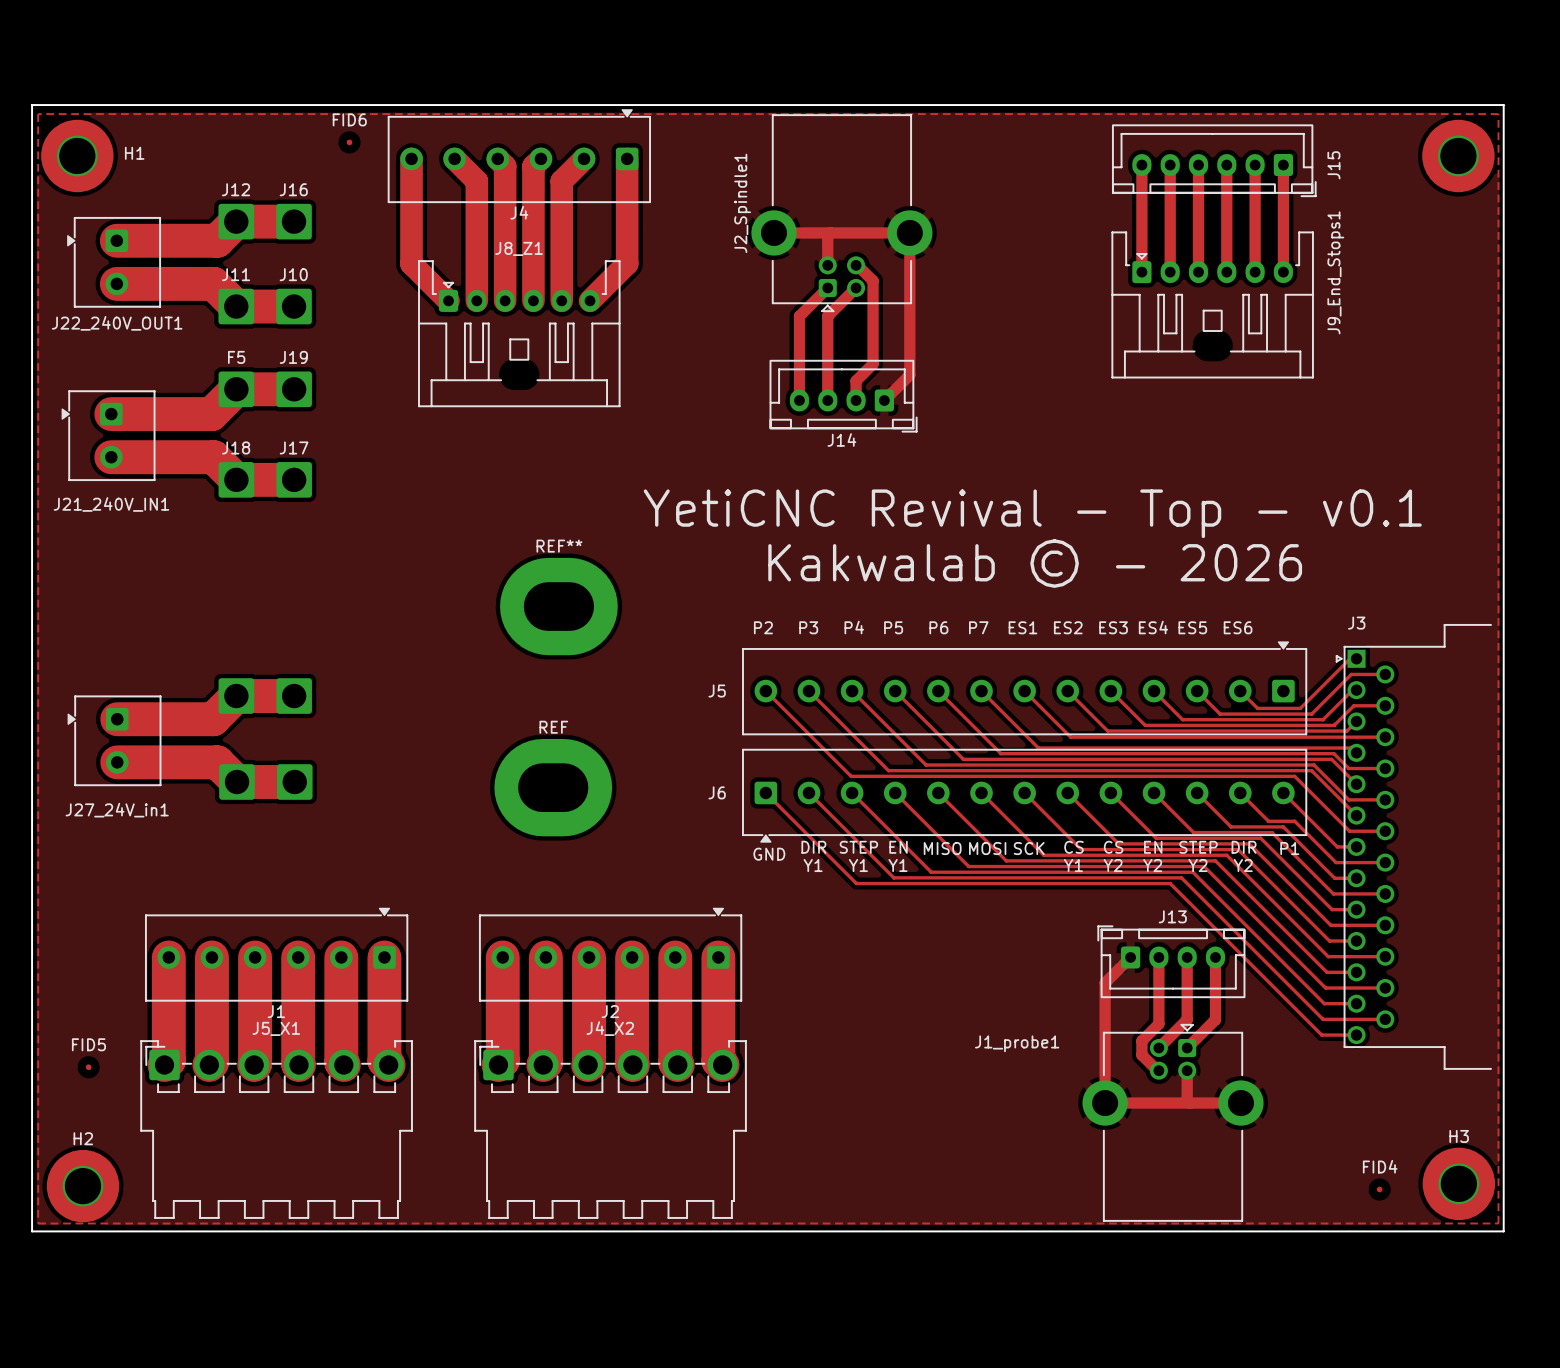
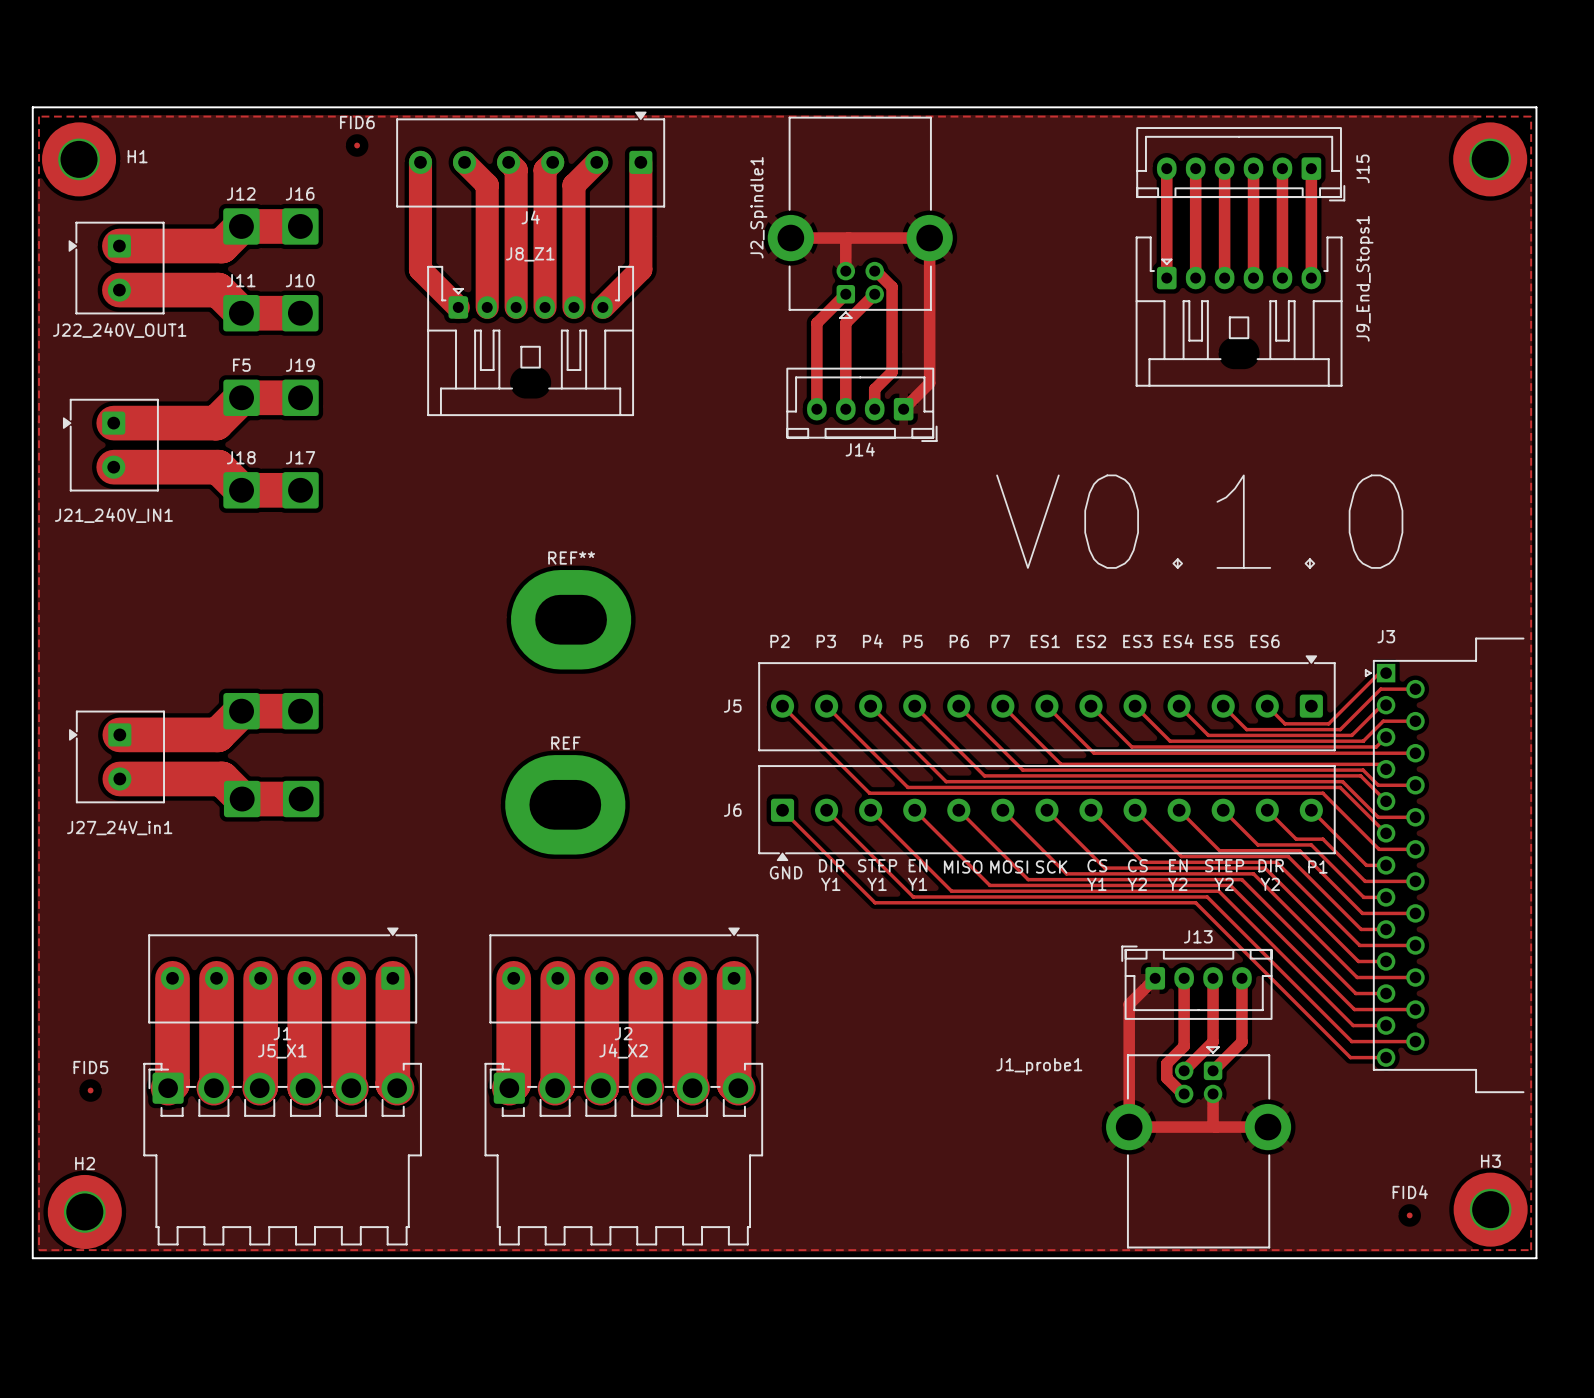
text: none -> V0.1.0 (1199, 521)
text: YetiCNC Revival - Top - v0.1 (1032, 513) -> none
text: Kakwalab © - 2026 (1035, 563) -> none

